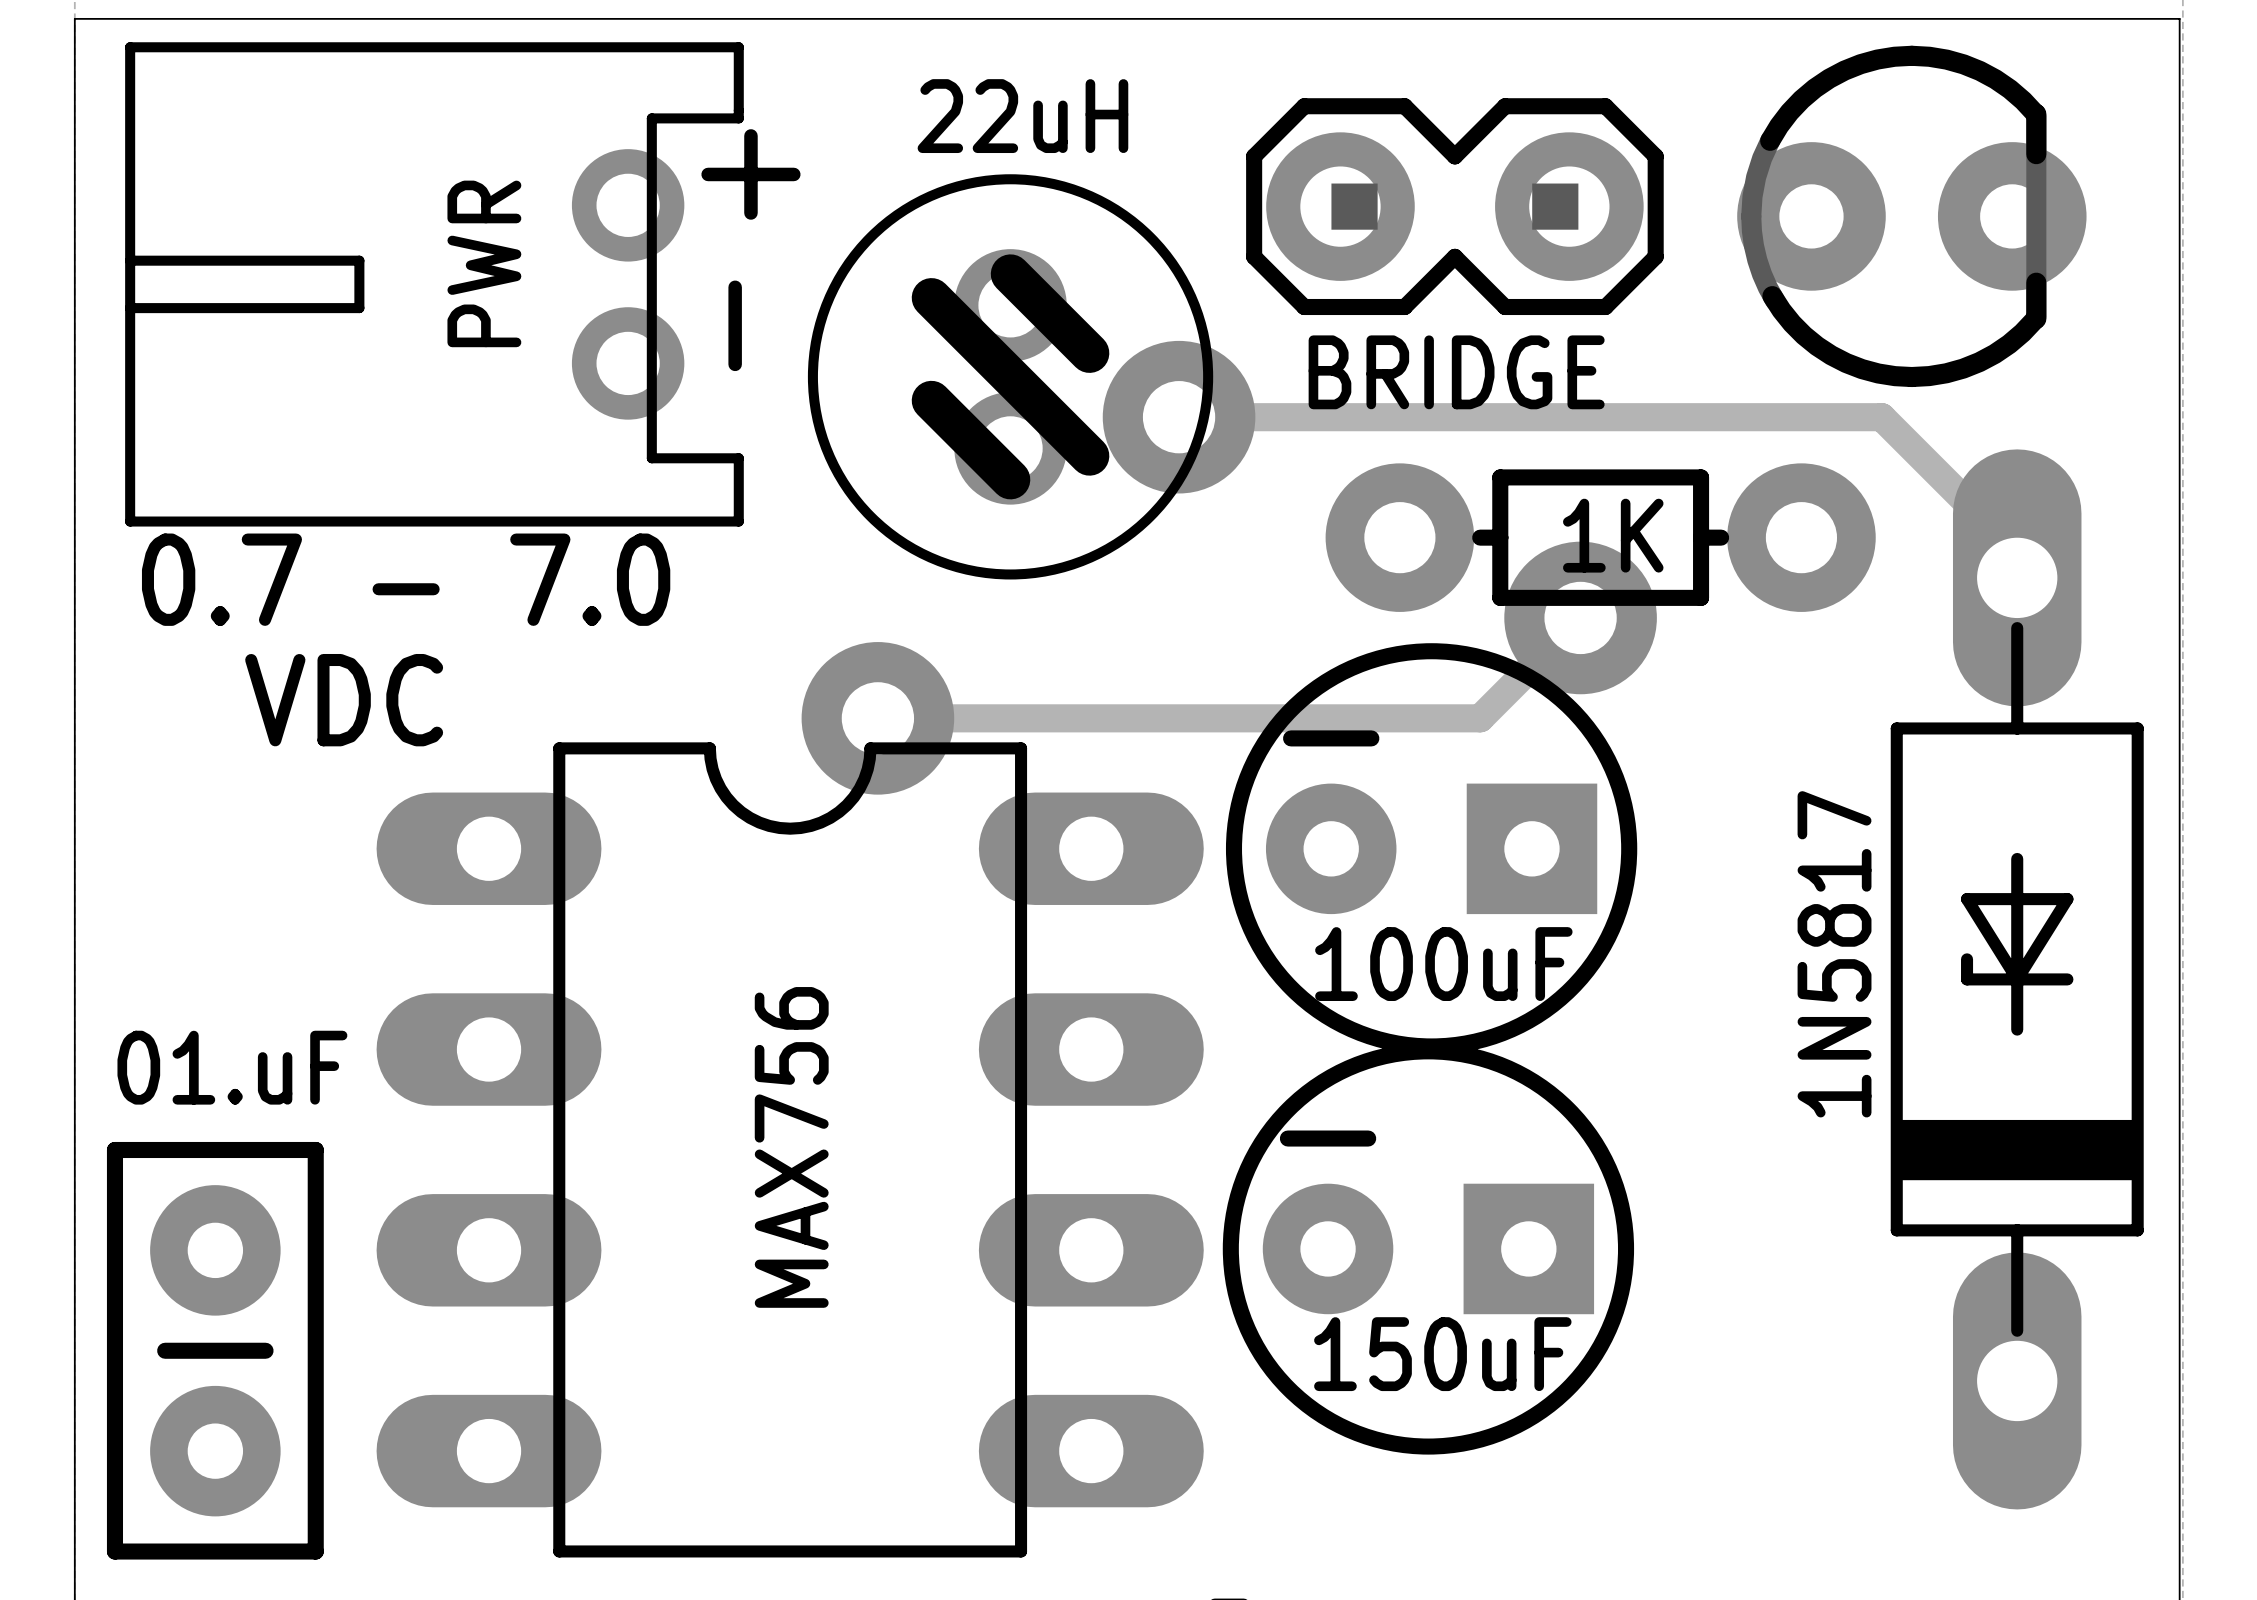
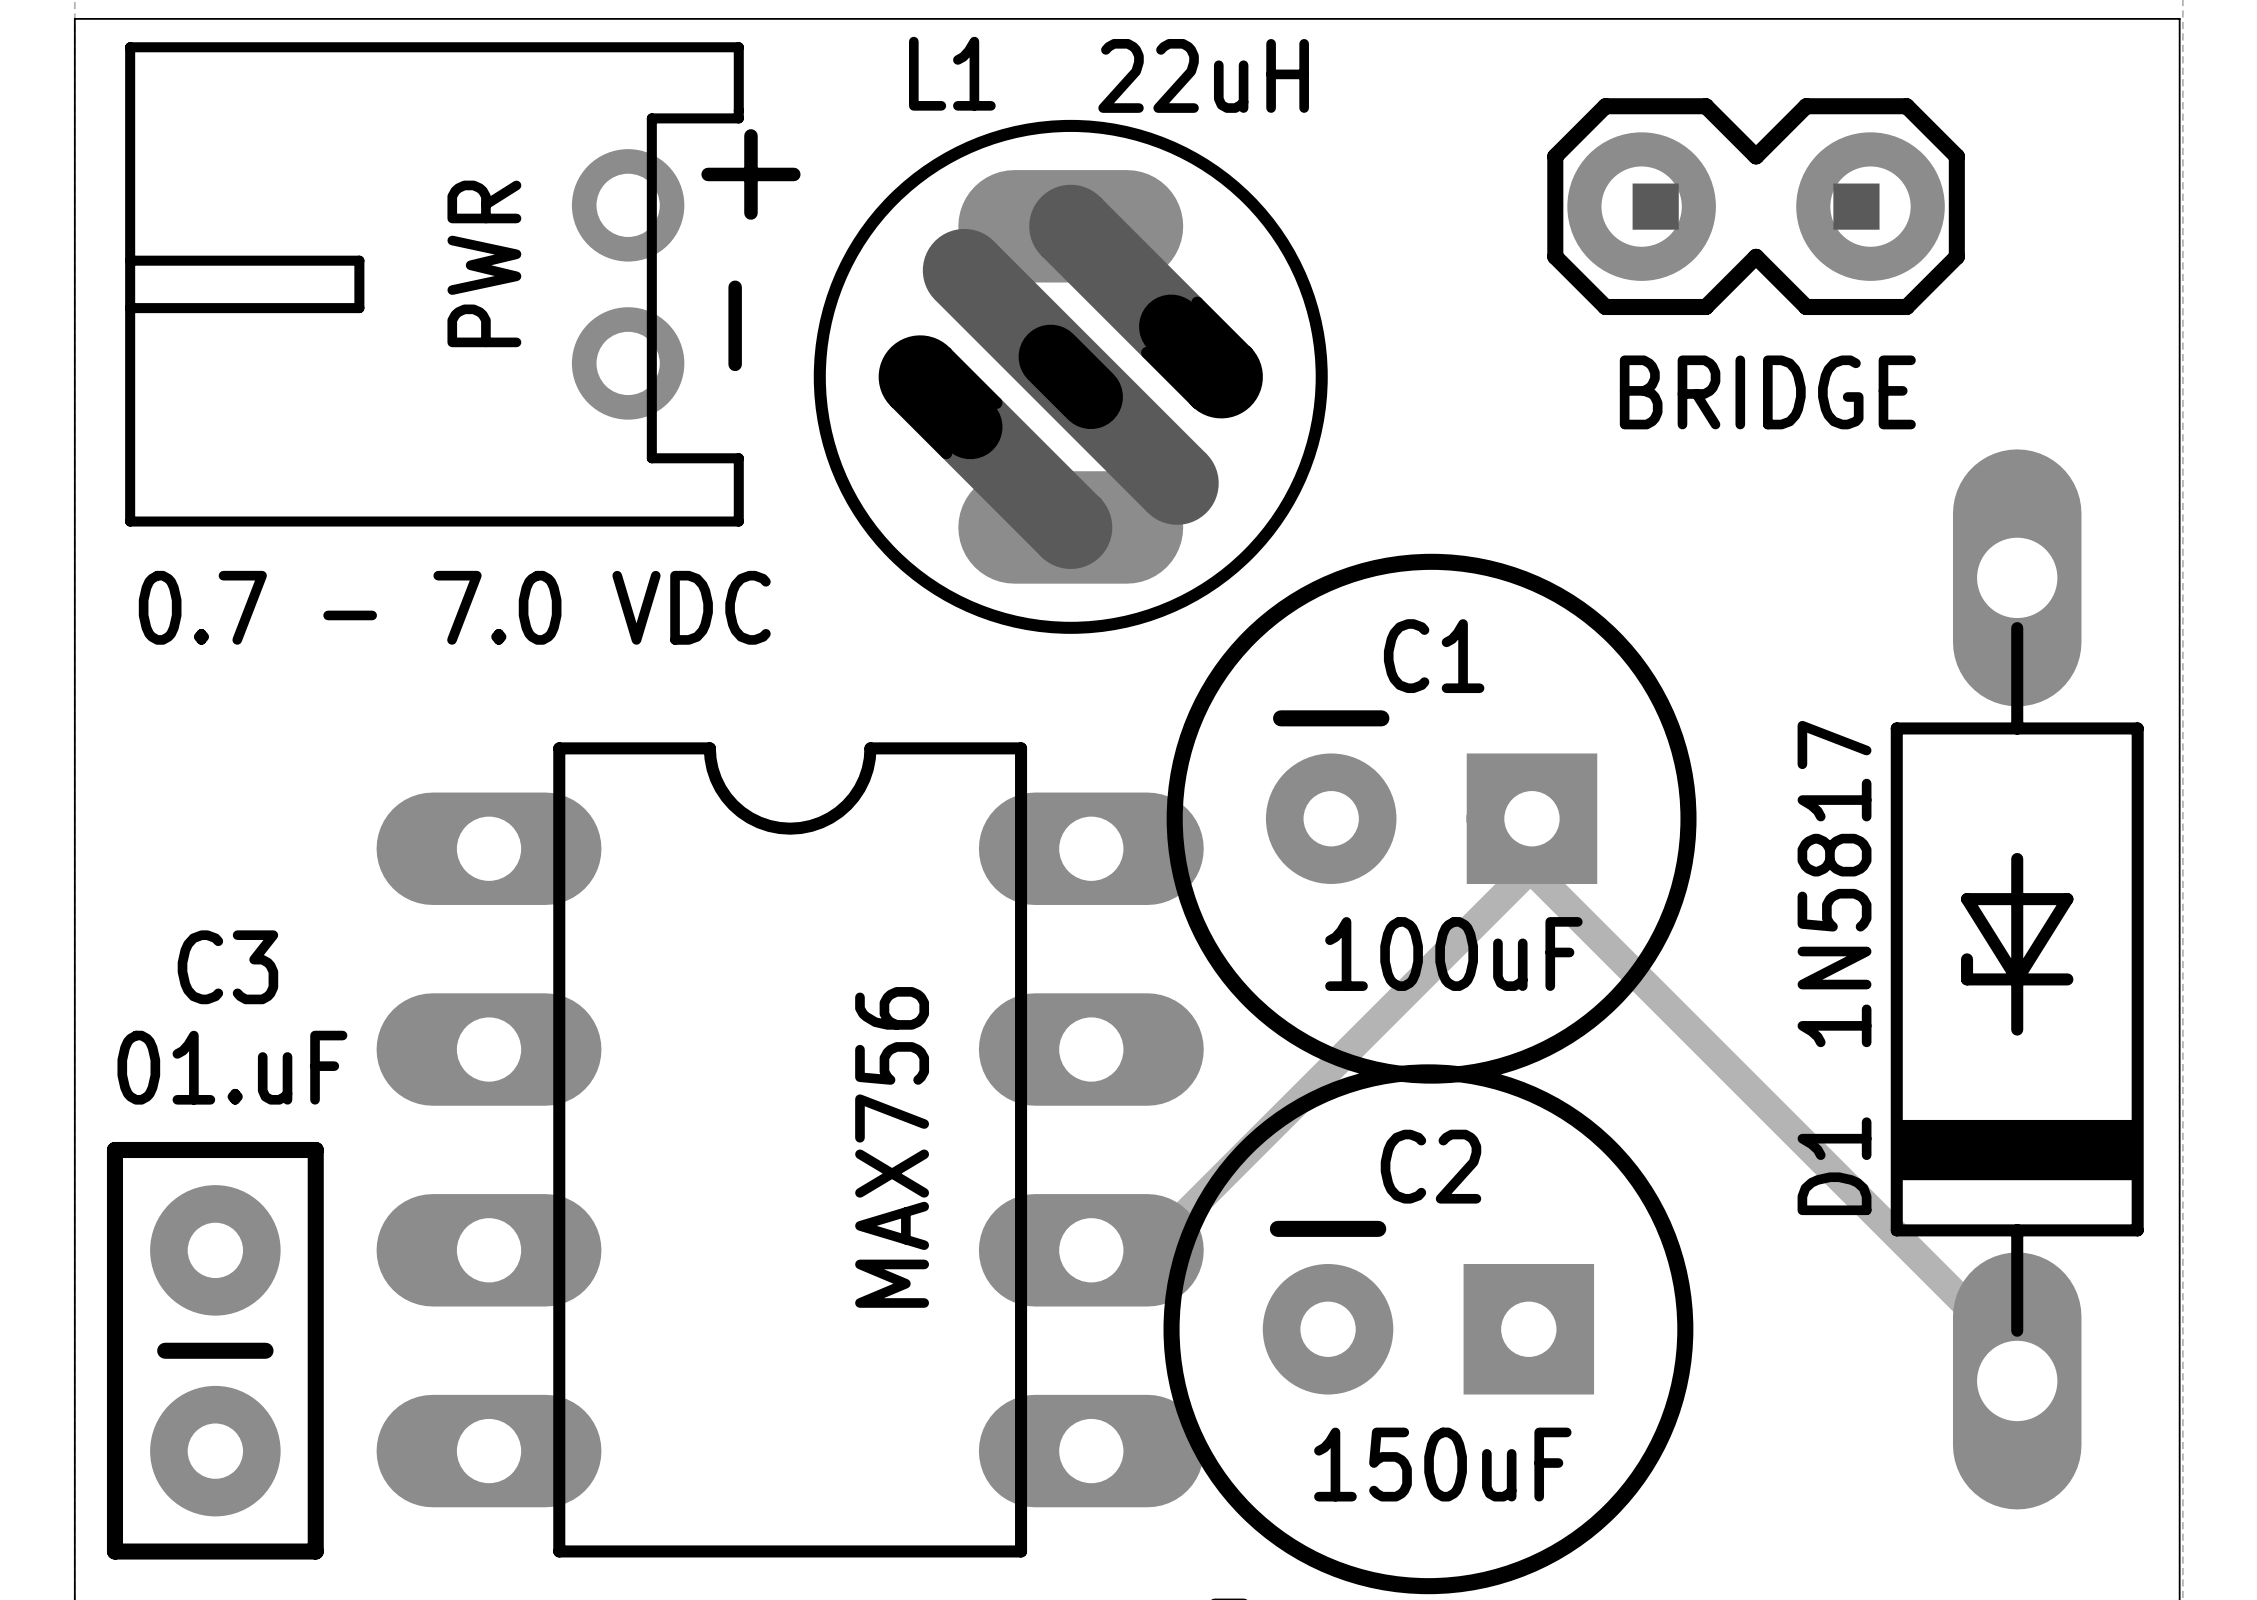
BRIDGE position: (1454, 206) -> (1756, 206)
part: (1911, 216) -> none
BRIDGE name position: BRIDGE (1456, 372) -> BRIDGE (1767, 392)
part: 22uH (1010, 376) -> none
L1: none -> 22uH (1070, 376)
track: (1179, 417) (1881, 417) (1982, 517) (2017, 577) -> none
via: (1179, 417) -> none
part: 1K (1600, 537) -> none
text: 0.7 - 7.0 (406, 579) -> 0.7 - 7.0 VDC (454, 607)
track: (1580, 617) (1480, 718) (877, 718) -> none
via: (1580, 617) -> none
text: VDC (344, 700) -> none
via: (877, 718) -> none
C1: none -> 100uF (1431, 818)
part: 100uF (1431, 848) -> none
D1 value position: 1N5817 (1834, 954) -> 1N5817 (1834, 884)
C3 name: none -> C3 (227, 967)
MAX756 name position: MAX756 (791, 1147) -> MAX756 (892, 1147)
D1 name: none -> D1 (1834, 1166)
part: 150uF (1428, 1248) -> none
track: none -> (1091, 1250) (1179, 1220) (1580, 818) (1480, 818) (1982, 1320) (2017, 1380)
C2: none -> 150uF (1428, 1329)

